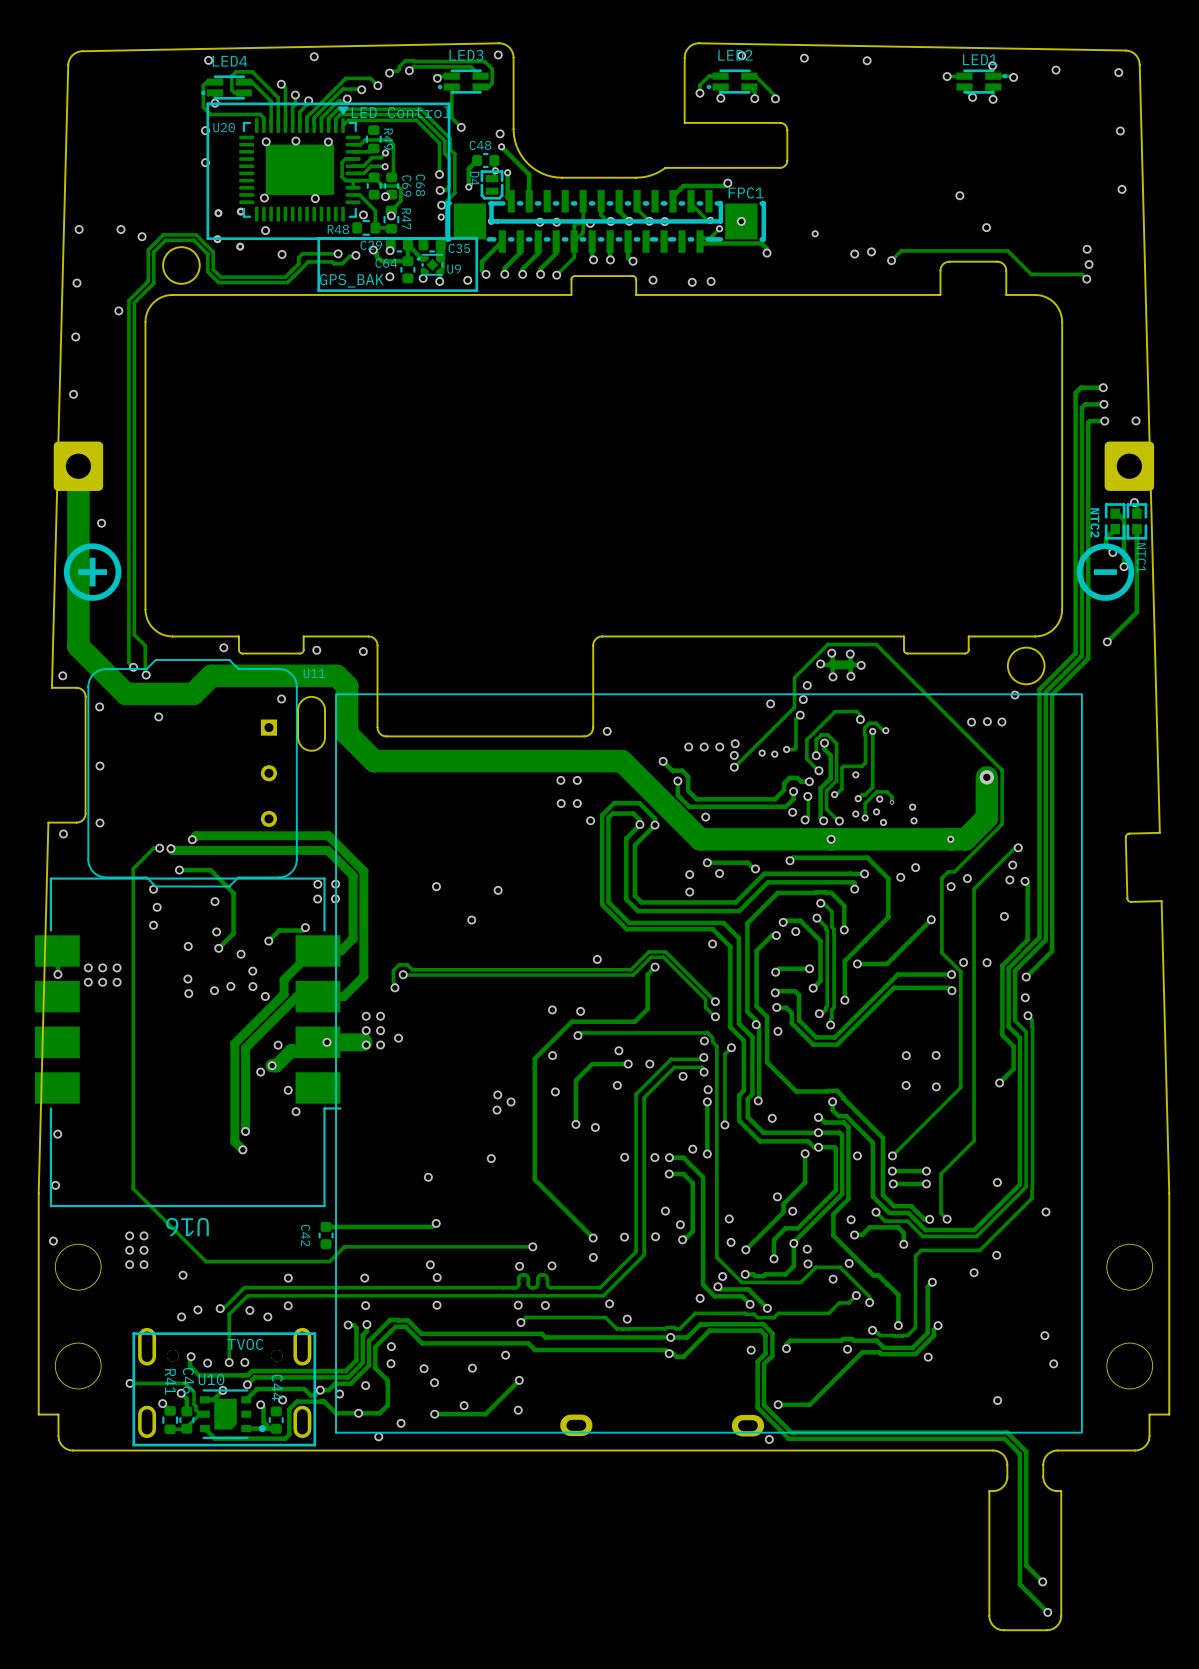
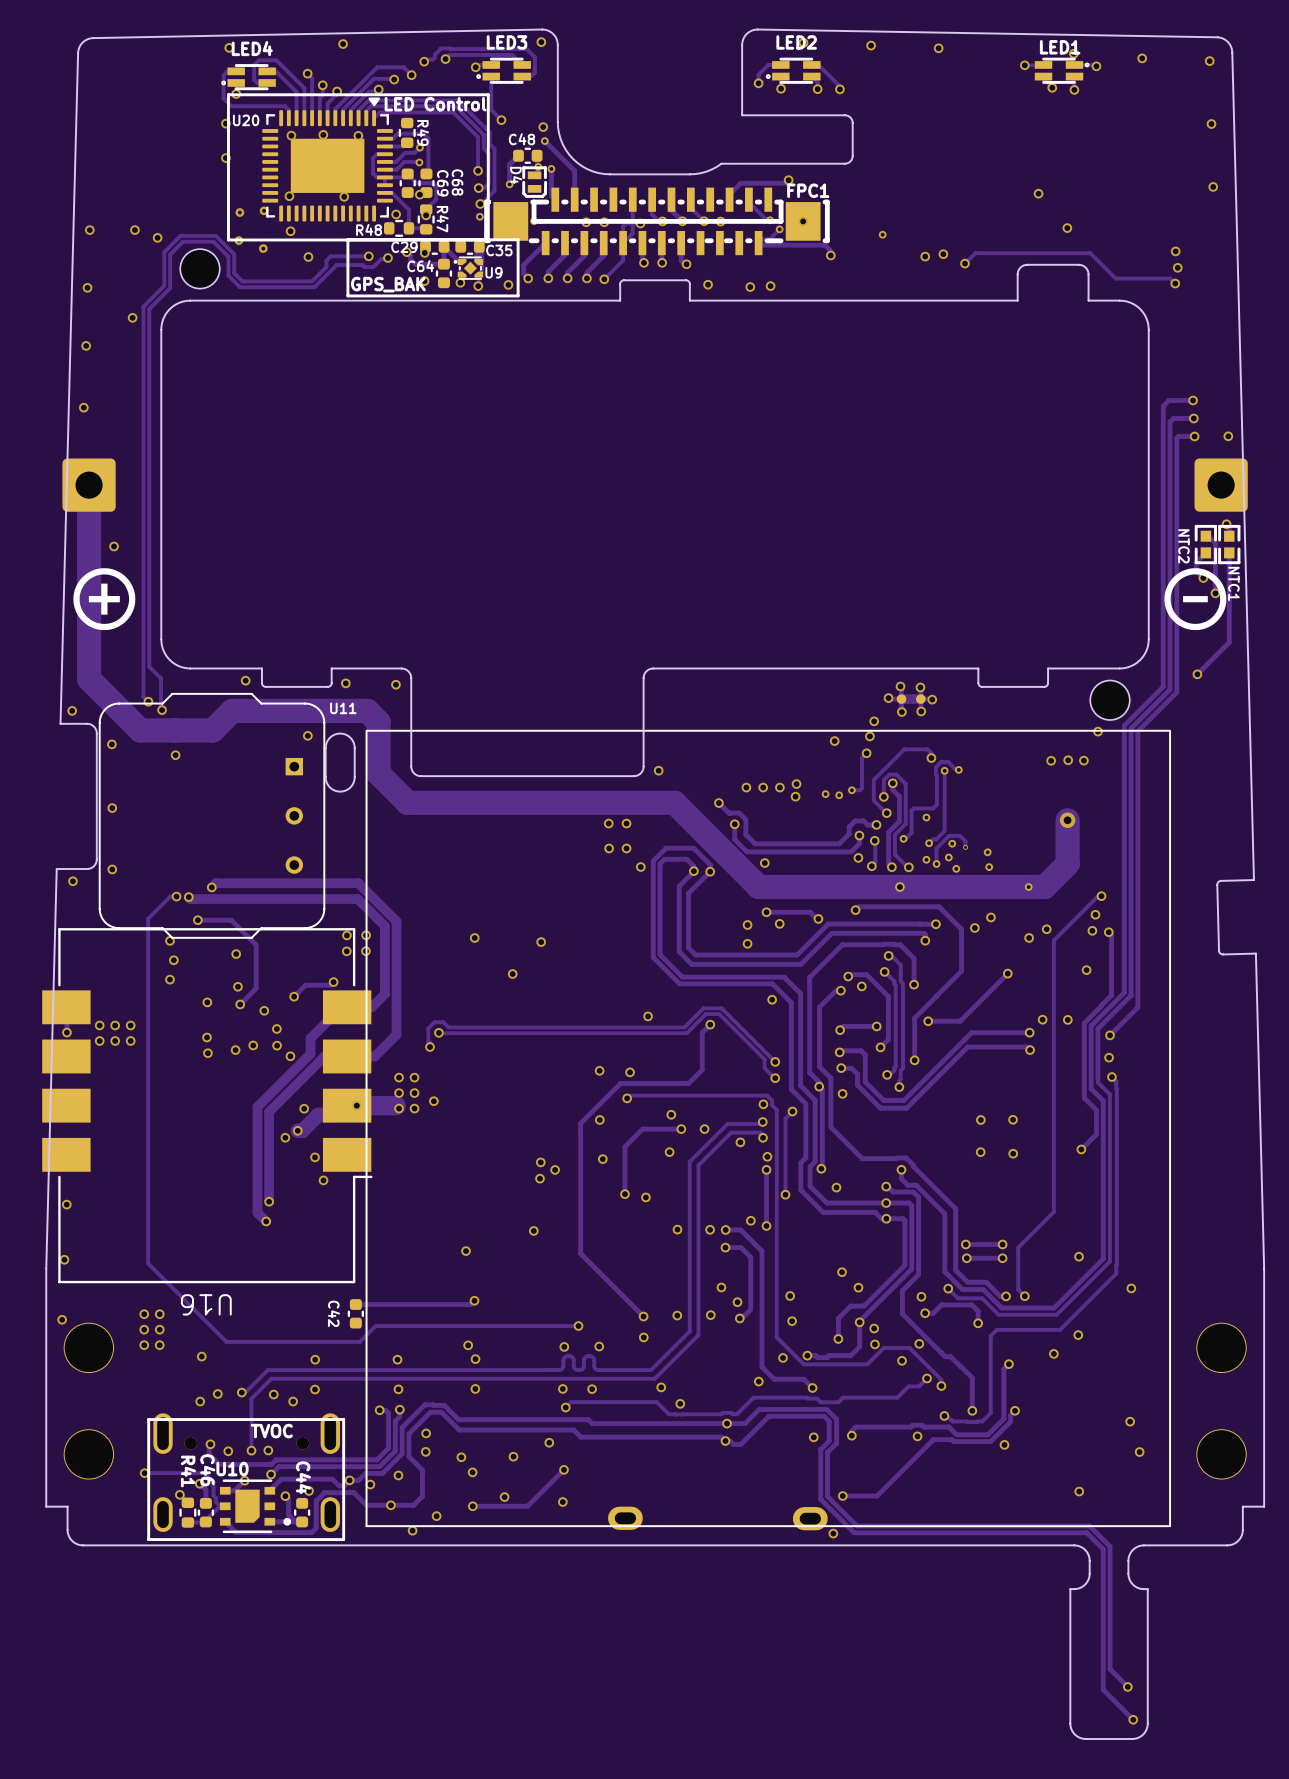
track: (734, 767) (794, 707) (794, 677) (827, 644) (876, 644) (1002, 770) (1002, 824) (954, 871) (948, 871) (941, 878) (941, 952) (960, 971) (960, 1087) (892, 1155) -> none
via: (734, 767) -> none
track: (805, 1153) (805, 1182) (783, 1204) (783, 1212) (745, 1249) -> none
via: (805, 1153) -> none
via: (857, 1155) -> none
via: (892, 1155) -> none
via: (745, 1249) -> none
track: (717, 1286) (720, 1289) (748, 1289) (767, 1308) -> none
via: (717, 1286) -> none
via: (767, 1308) -> none

